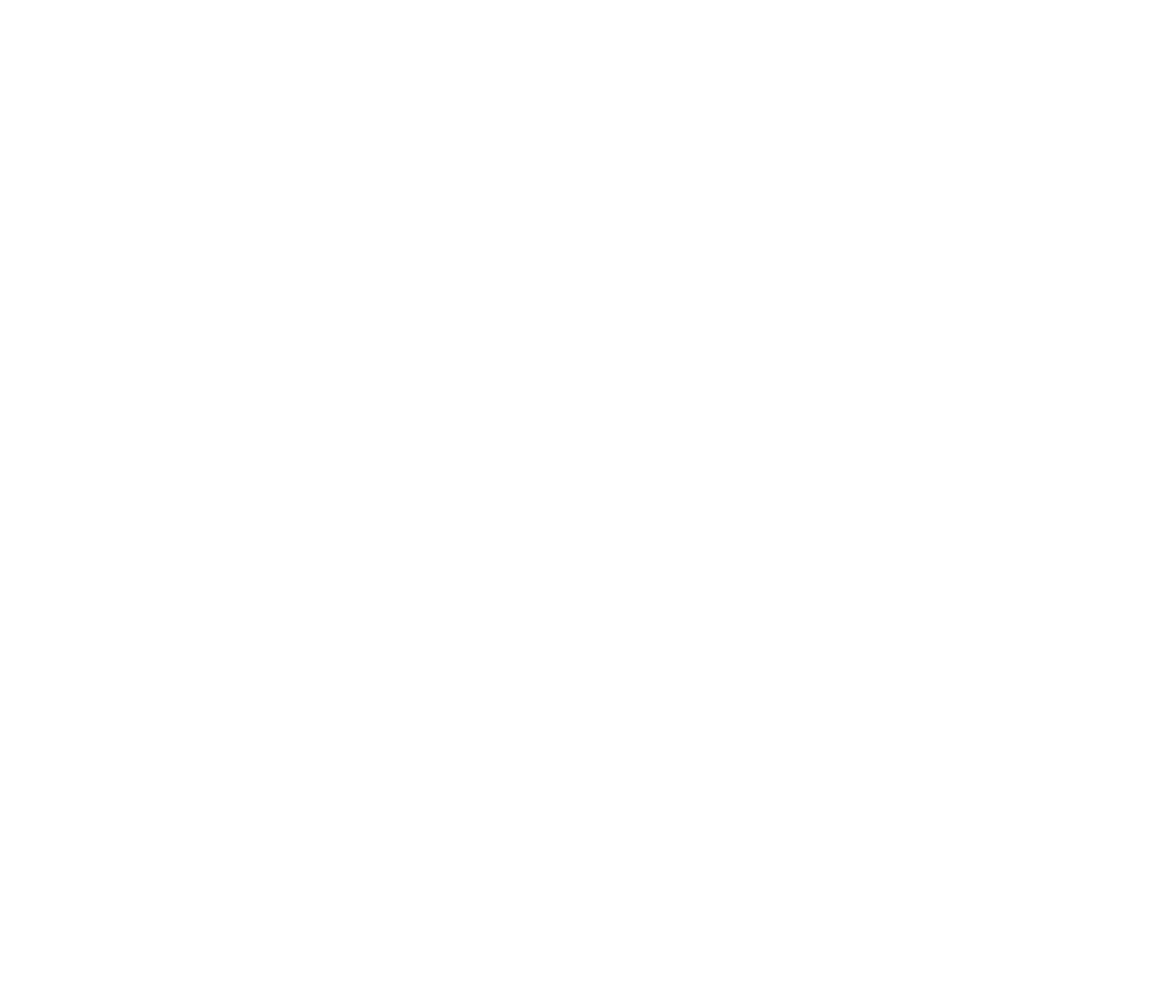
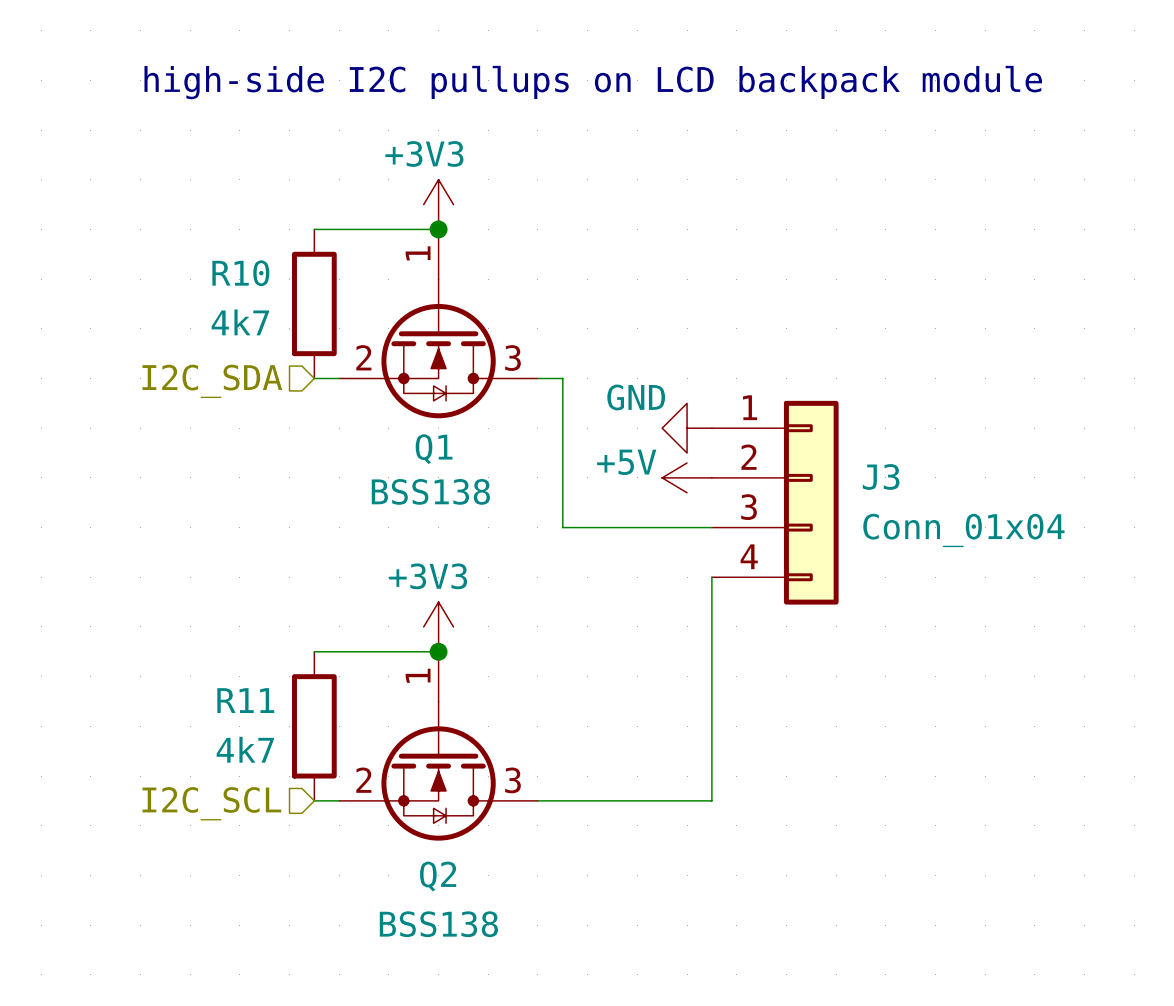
text: none -> high-side I2C pullups on LCD backpack module (593, 82)
power symbol: none -> +3V3 (438, 204)
wire: none -> (314, 229) (438, 229)
junction: none -> (438, 229)
R10: none -> 4k7 (314, 303)
Q1: none -> BSS138 (438, 323)
hierarchical label: none -> I2C_SDA (212, 381)
wire: none -> (314, 378) (339, 378)
wire: none -> (537, 378) (562, 378) (562, 527) (711, 527)
power symbol: none -> GND (687, 428)
power symbol: none -> +5V (687, 477)
J3: none -> Conn_01x04 (775, 502)
wire: none -> (711, 577) (711, 800) (537, 800)
power symbol: none -> +3V3 (438, 626)
wire: none -> (314, 651) (438, 651)
junction: none -> (438, 651)
R11: none -> 4k7 (314, 726)
Q2: none -> BSS138 (438, 746)
hierarchical label: none -> I2C_SCL (211, 803)
wire: none -> (314, 800) (339, 800)

